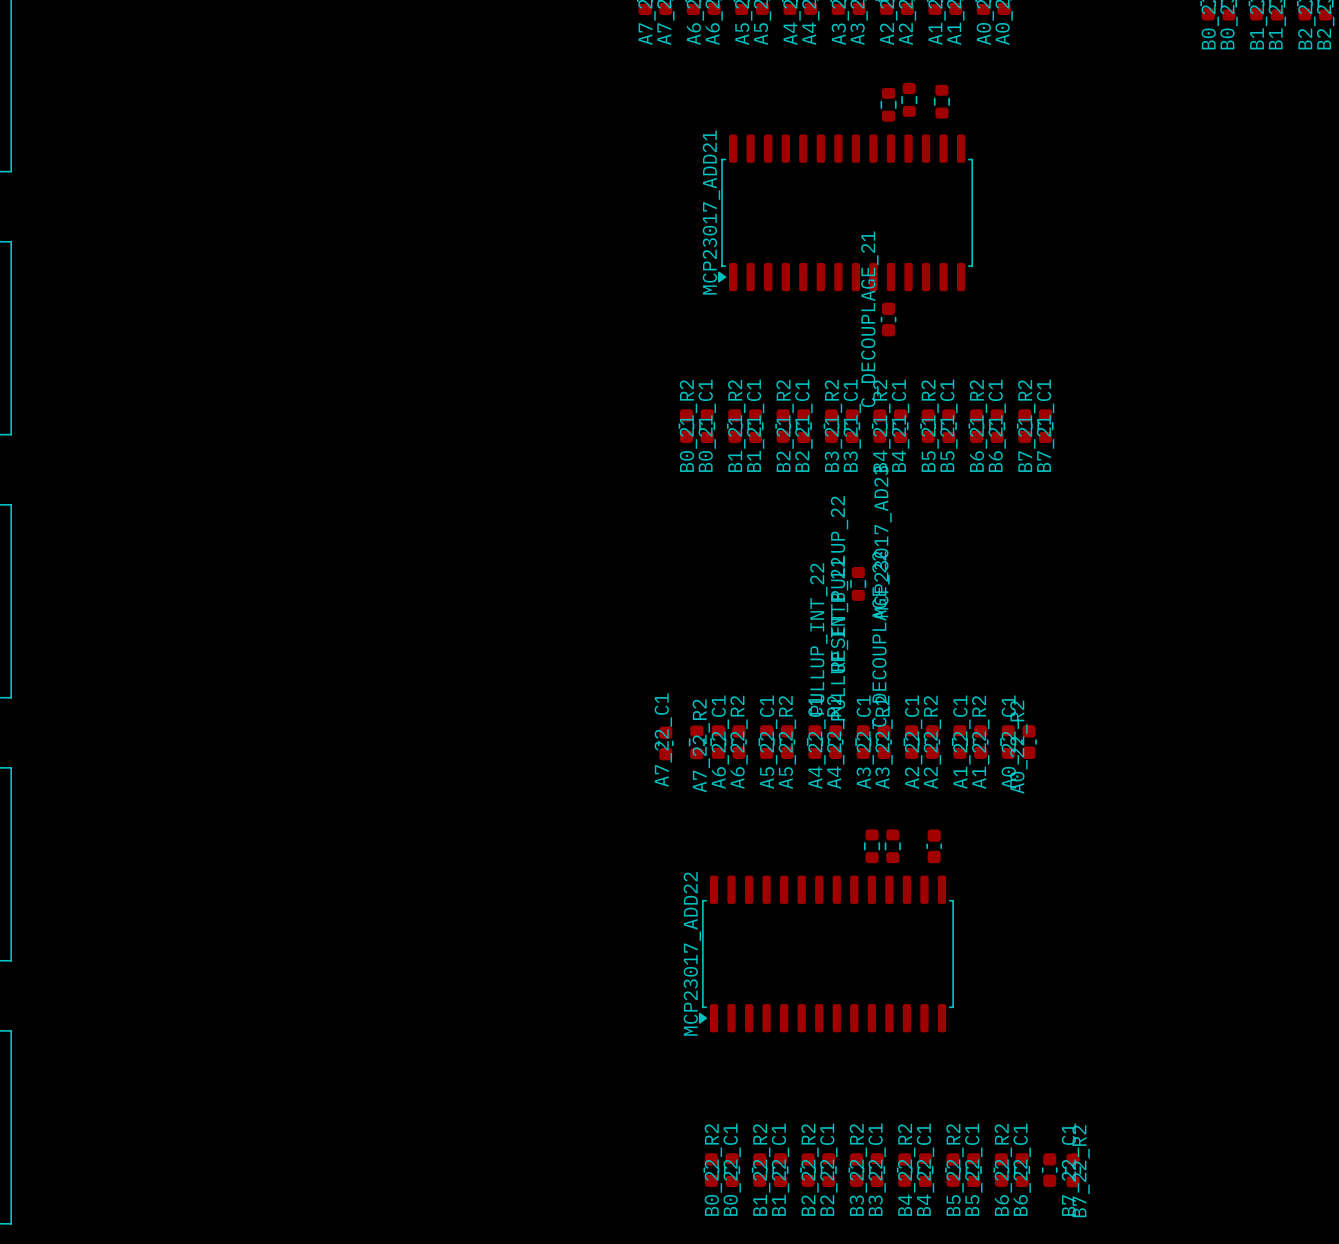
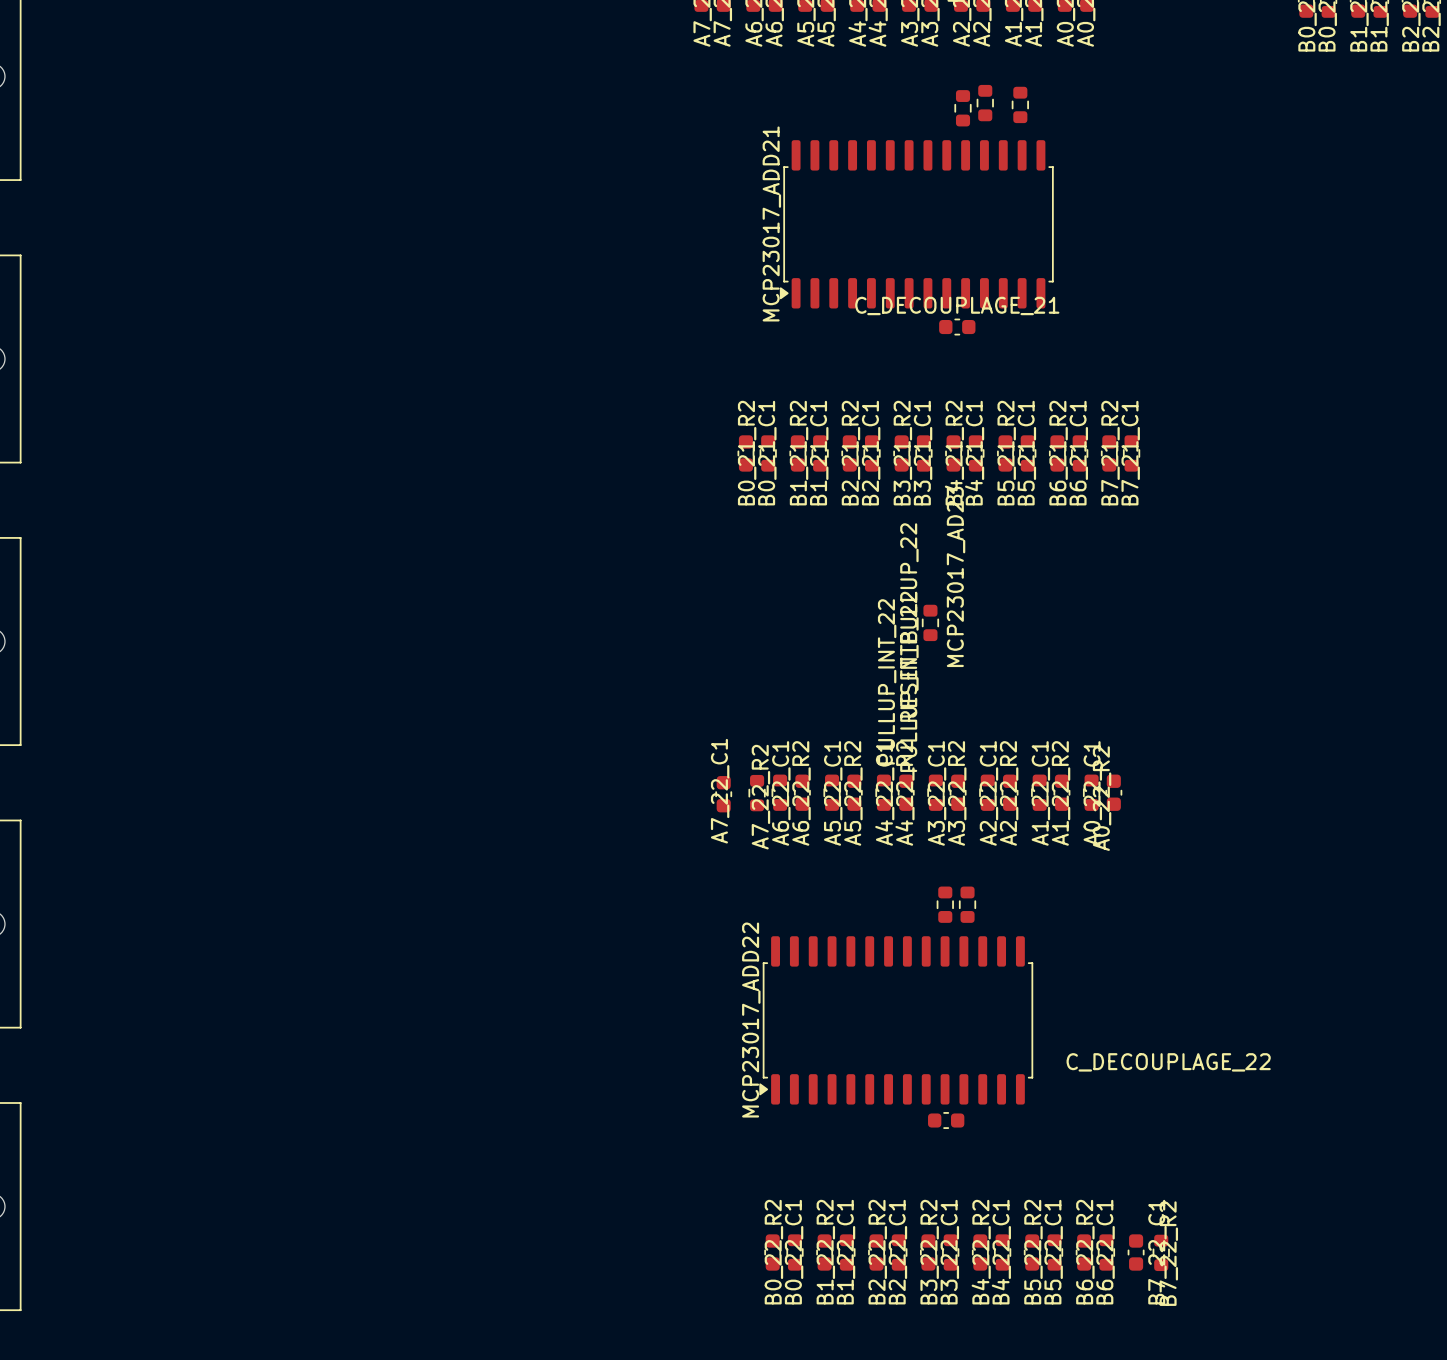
C_DECOUPLAGE_21 rotation: 0° (888, 319) -> 90° clockwise (957, 327)
C_DECOUPLAGE_22 rotation: 0° (934, 846) -> 90° clockwise (946, 1120)
C_DECOUPLAGE_22 position: (934, 846) -> (946, 1120)

